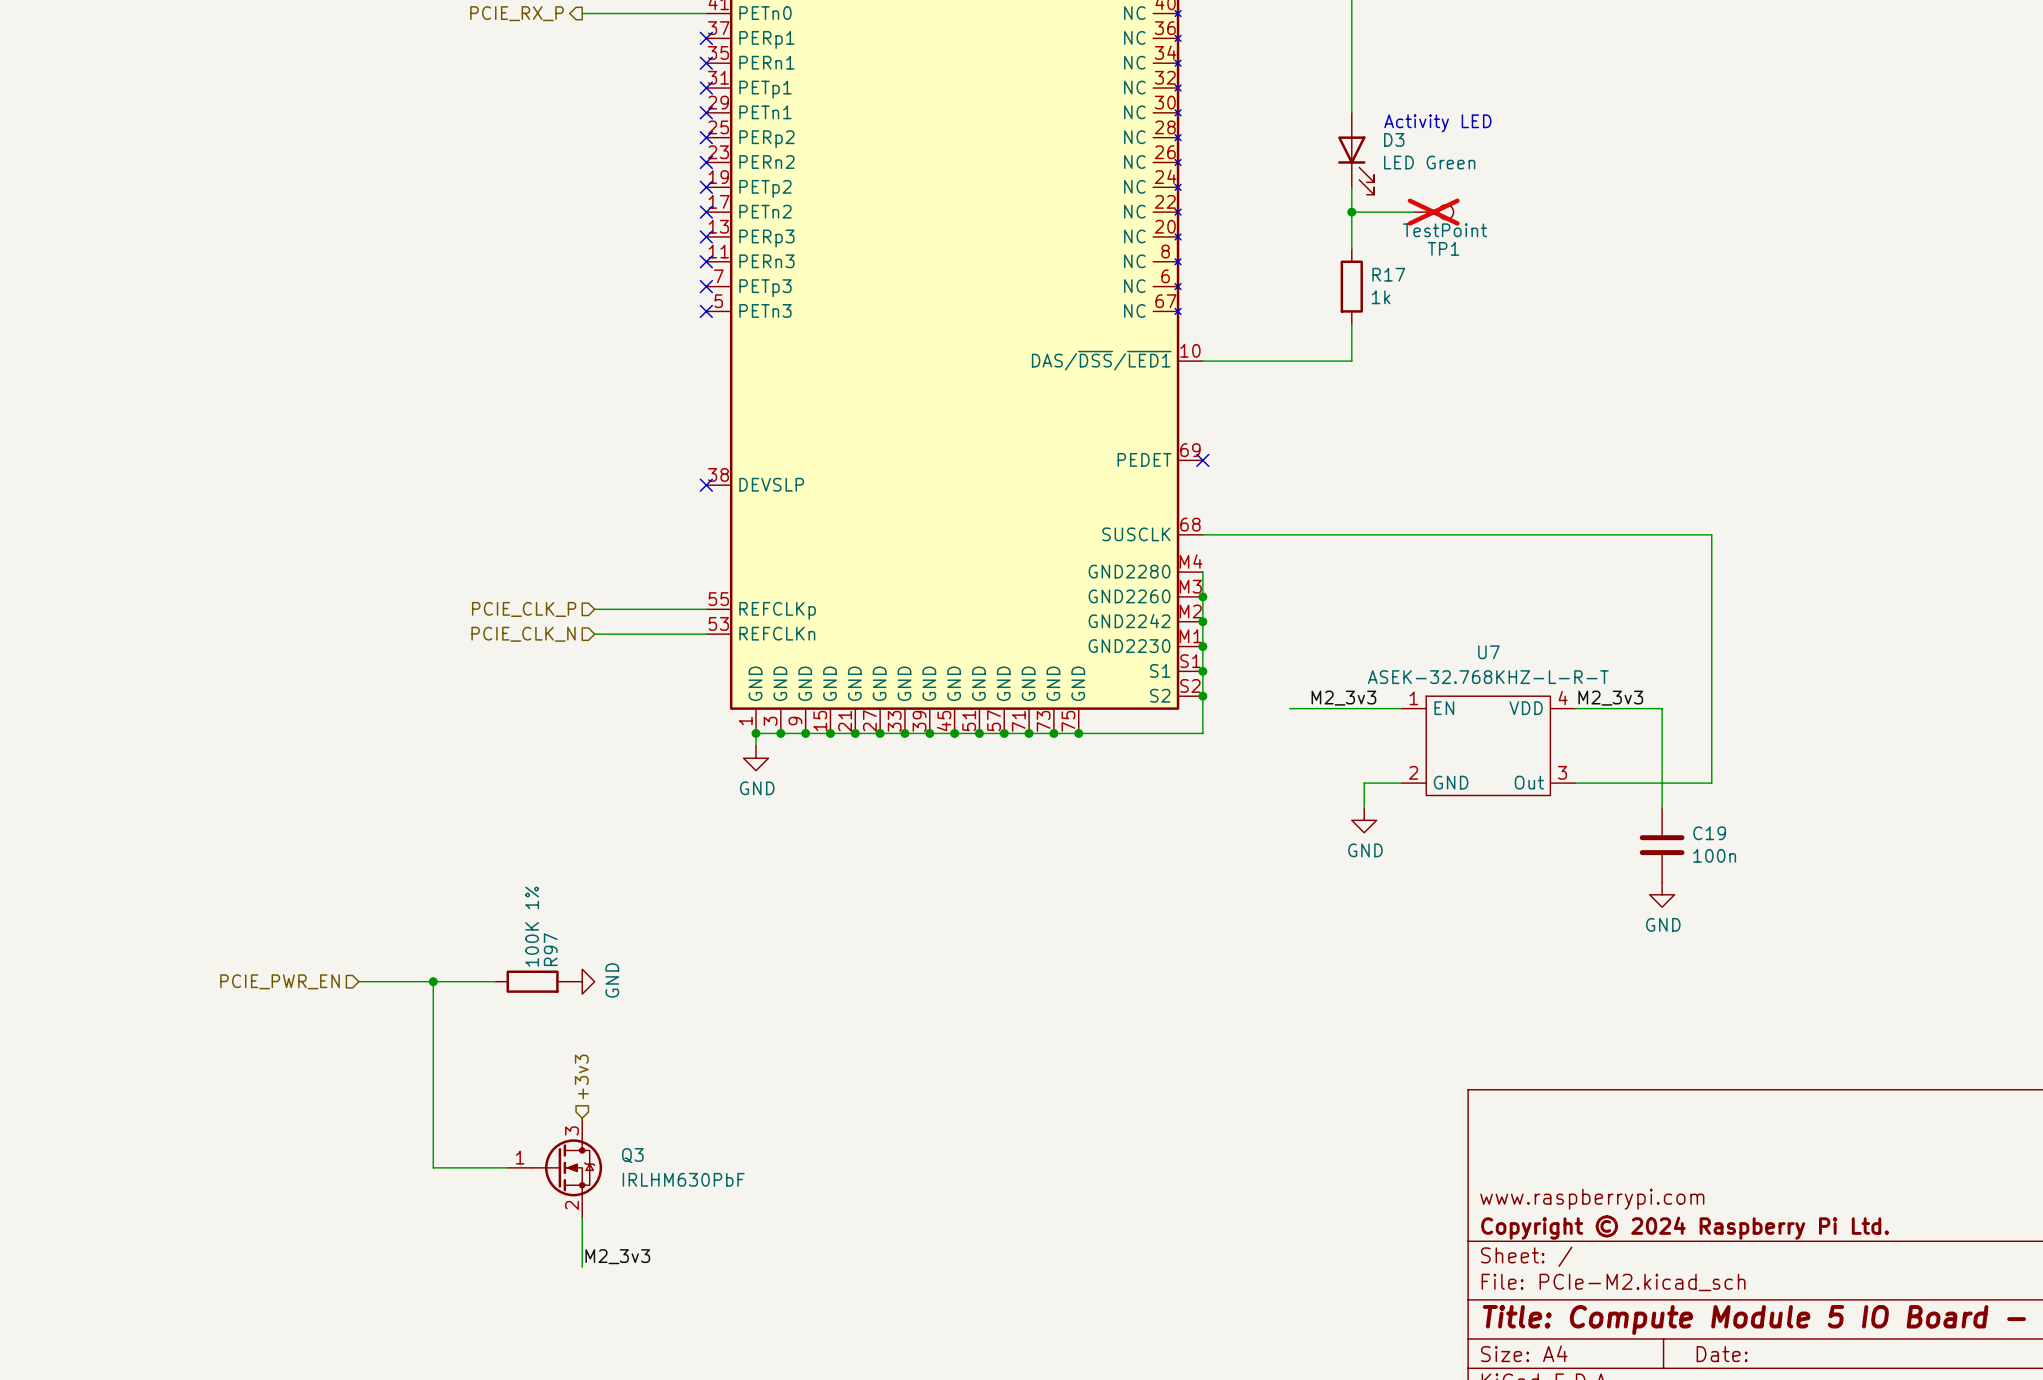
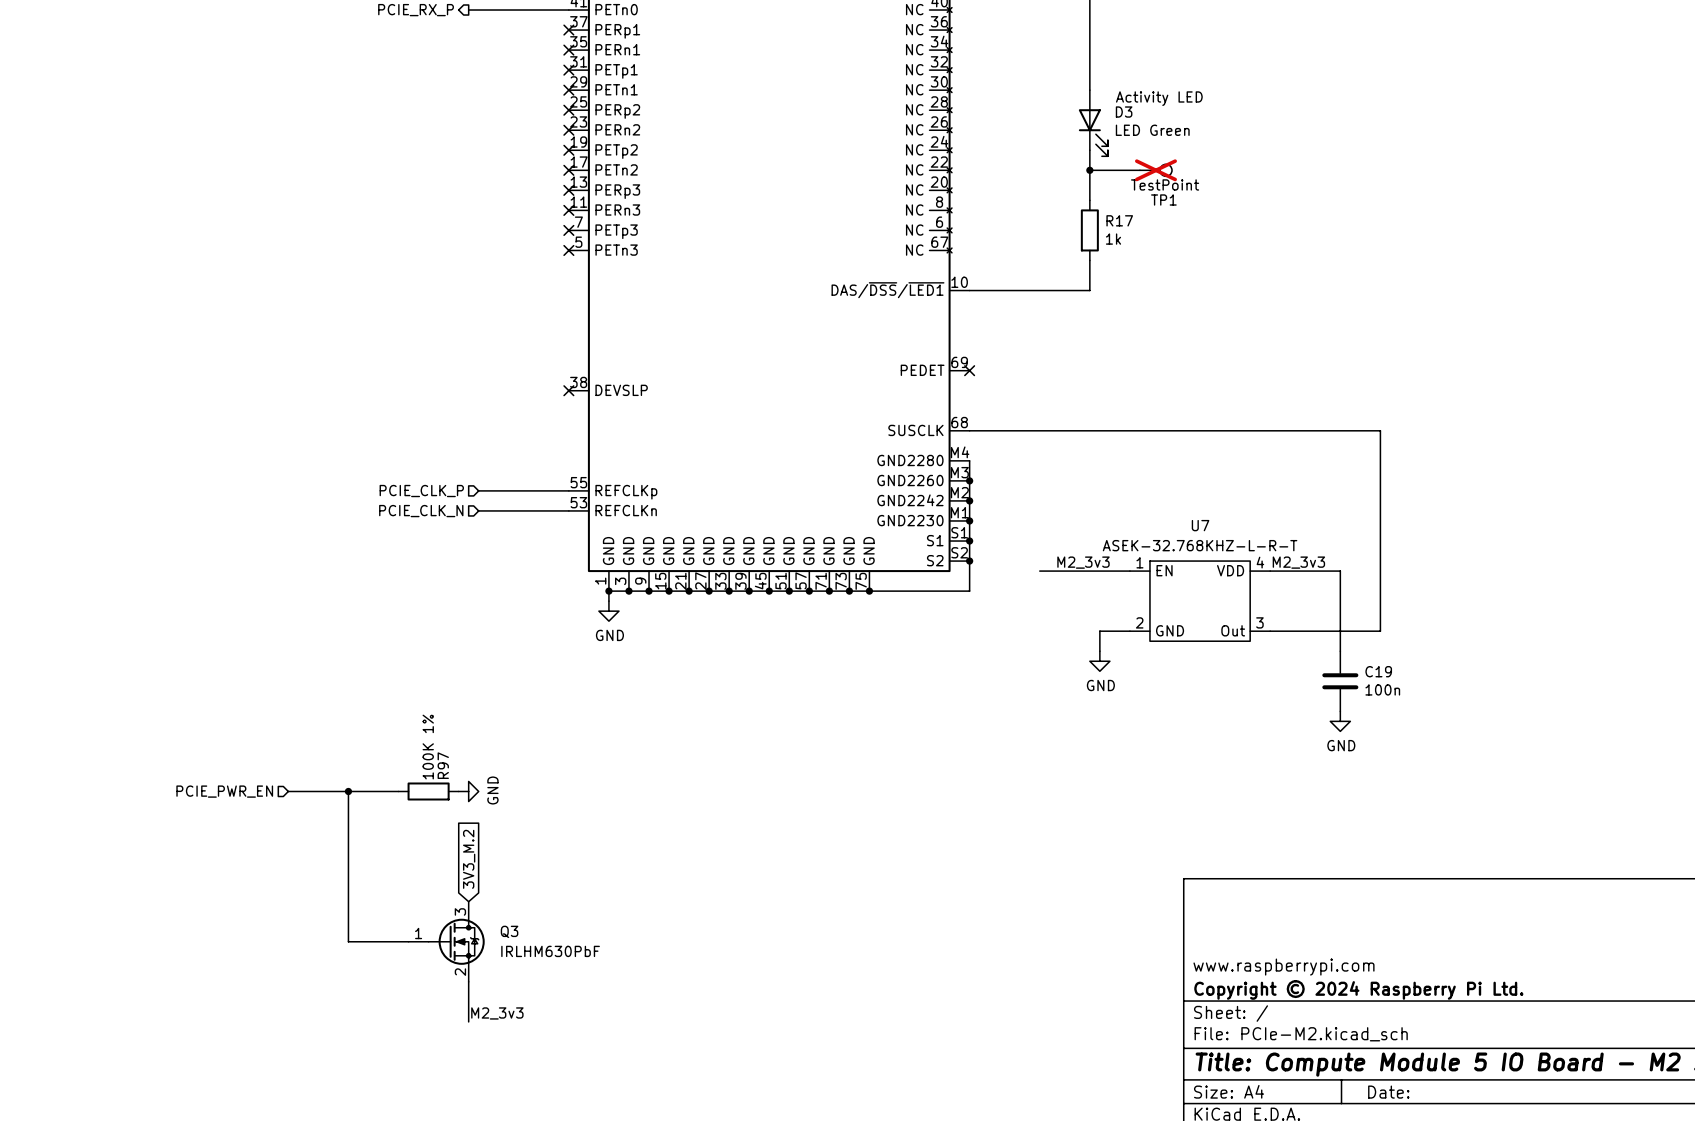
global label: none -> 3V3_M.2 (469, 859)
hierarchical label: +3v3 (581, 1076) -> none

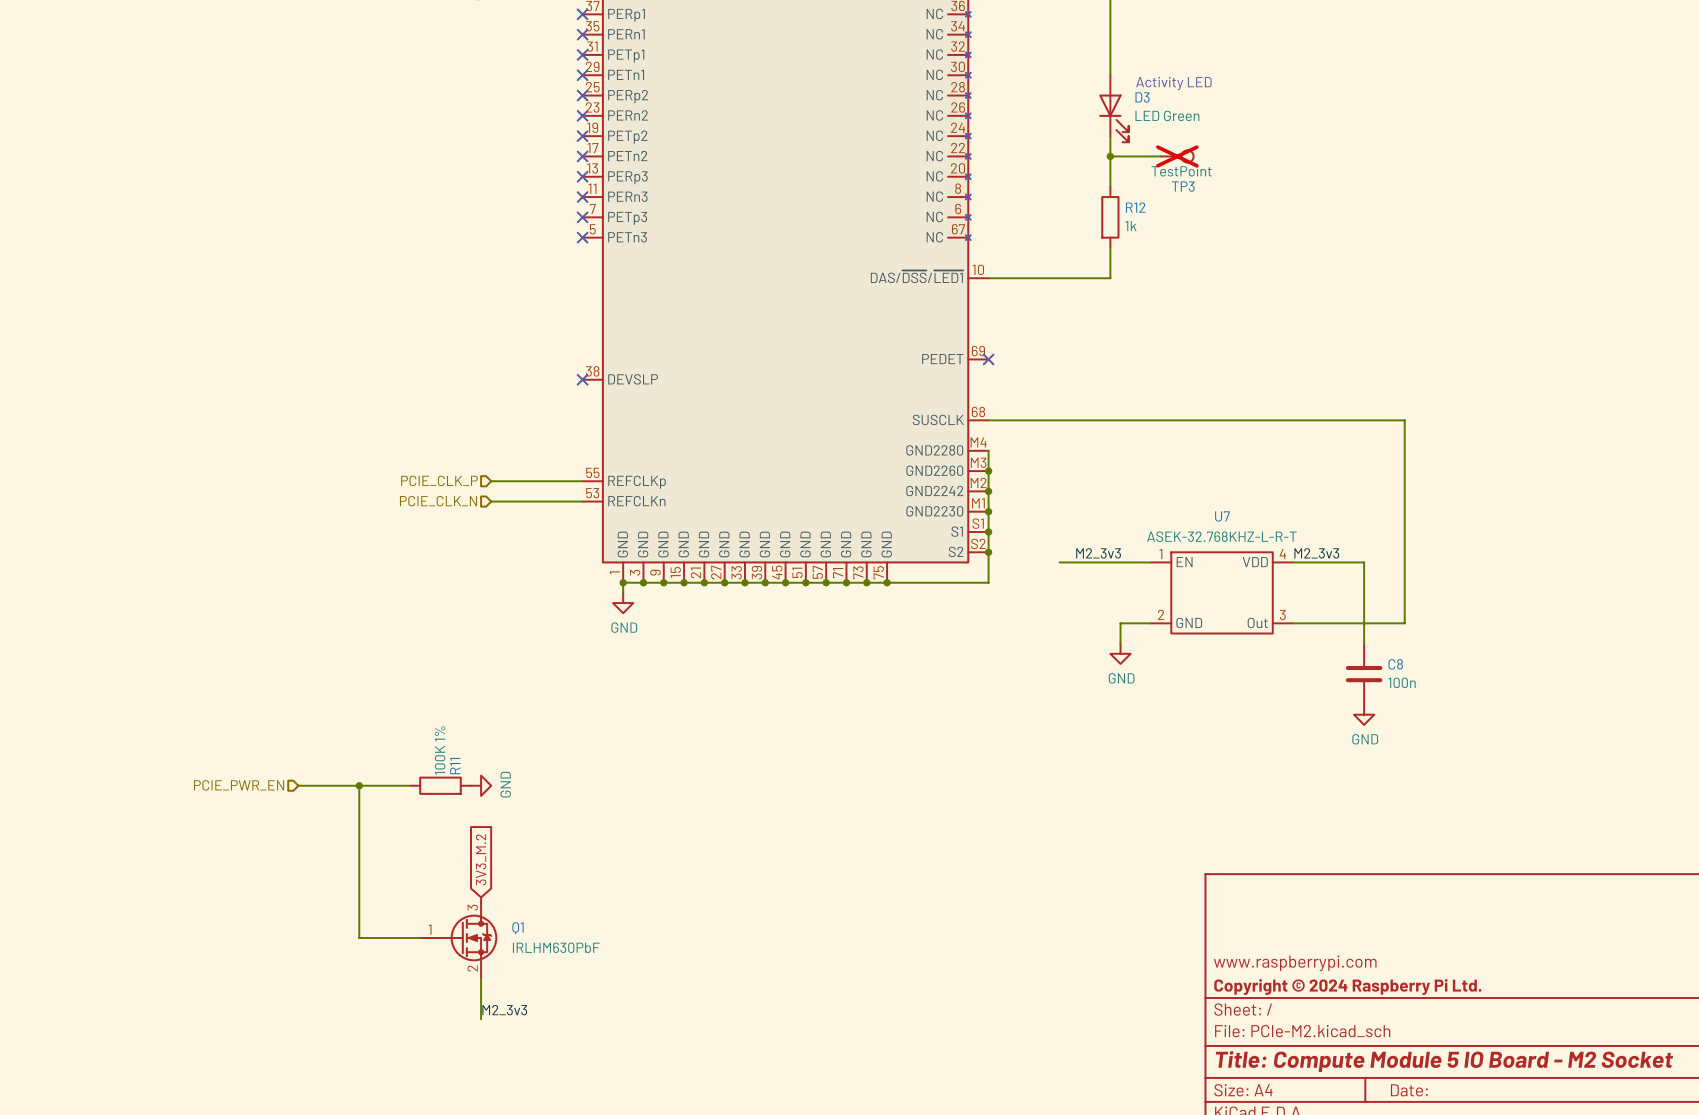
TP1 name: TP1 (1163, 199) -> TP3 (1183, 186)
R17 name: R17 (1119, 220) -> R12 (1135, 207)
C19 name: C19 (1378, 671) -> C8 (1395, 664)
R97 name: R97 (443, 765) -> R11 (455, 766)
Q3 name: Q3 (509, 931) -> Q1 (517, 928)

